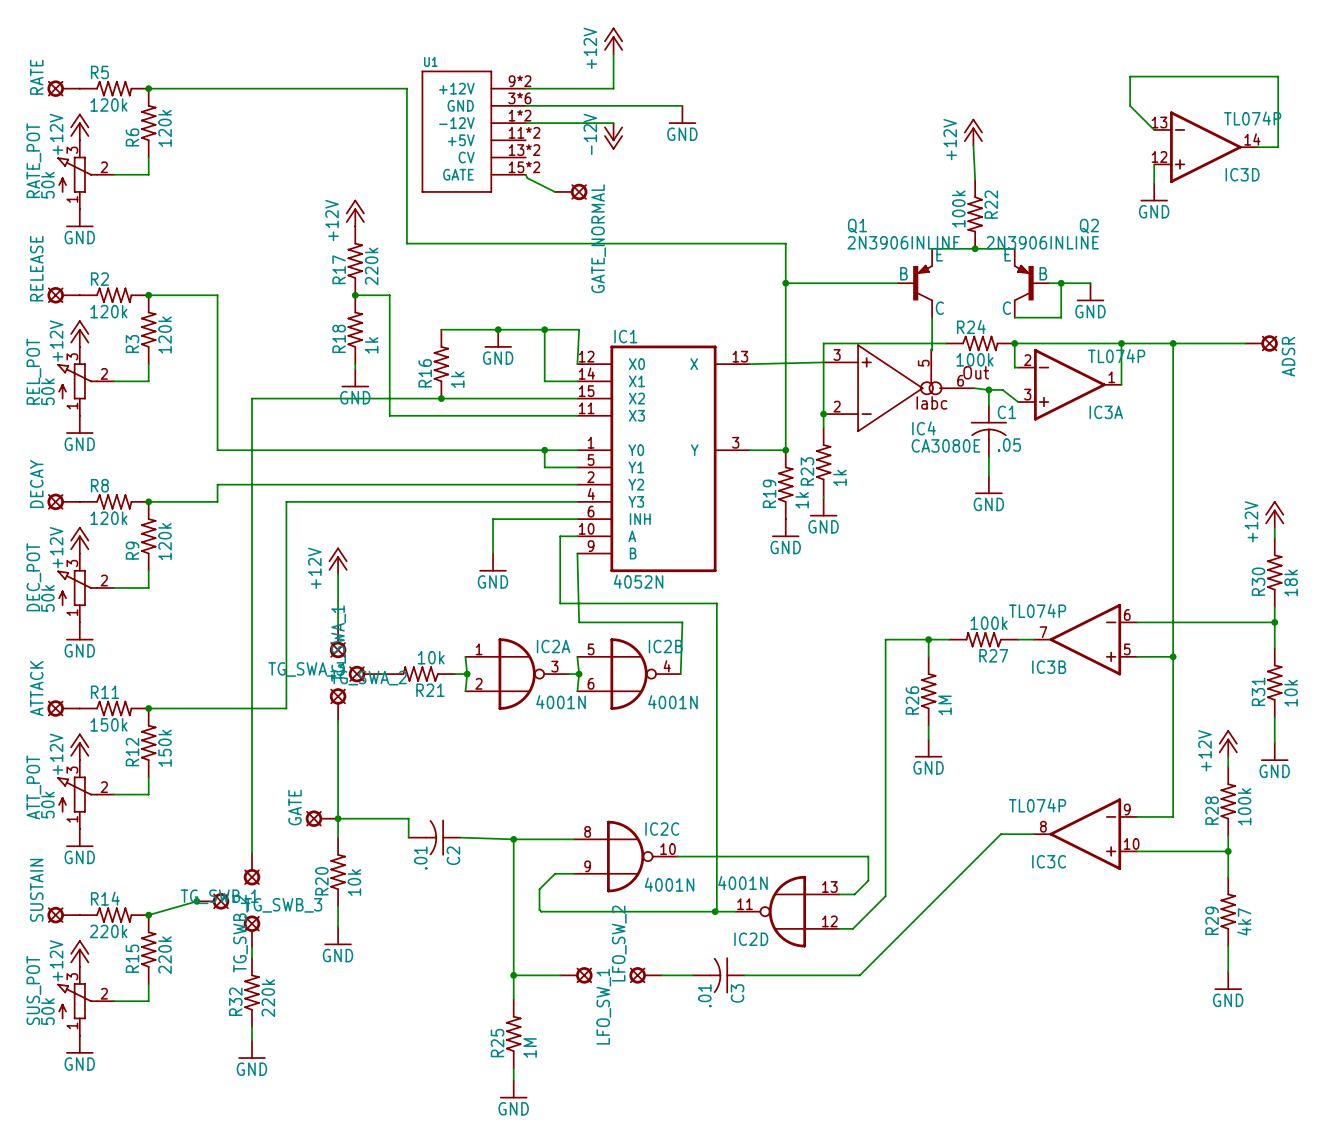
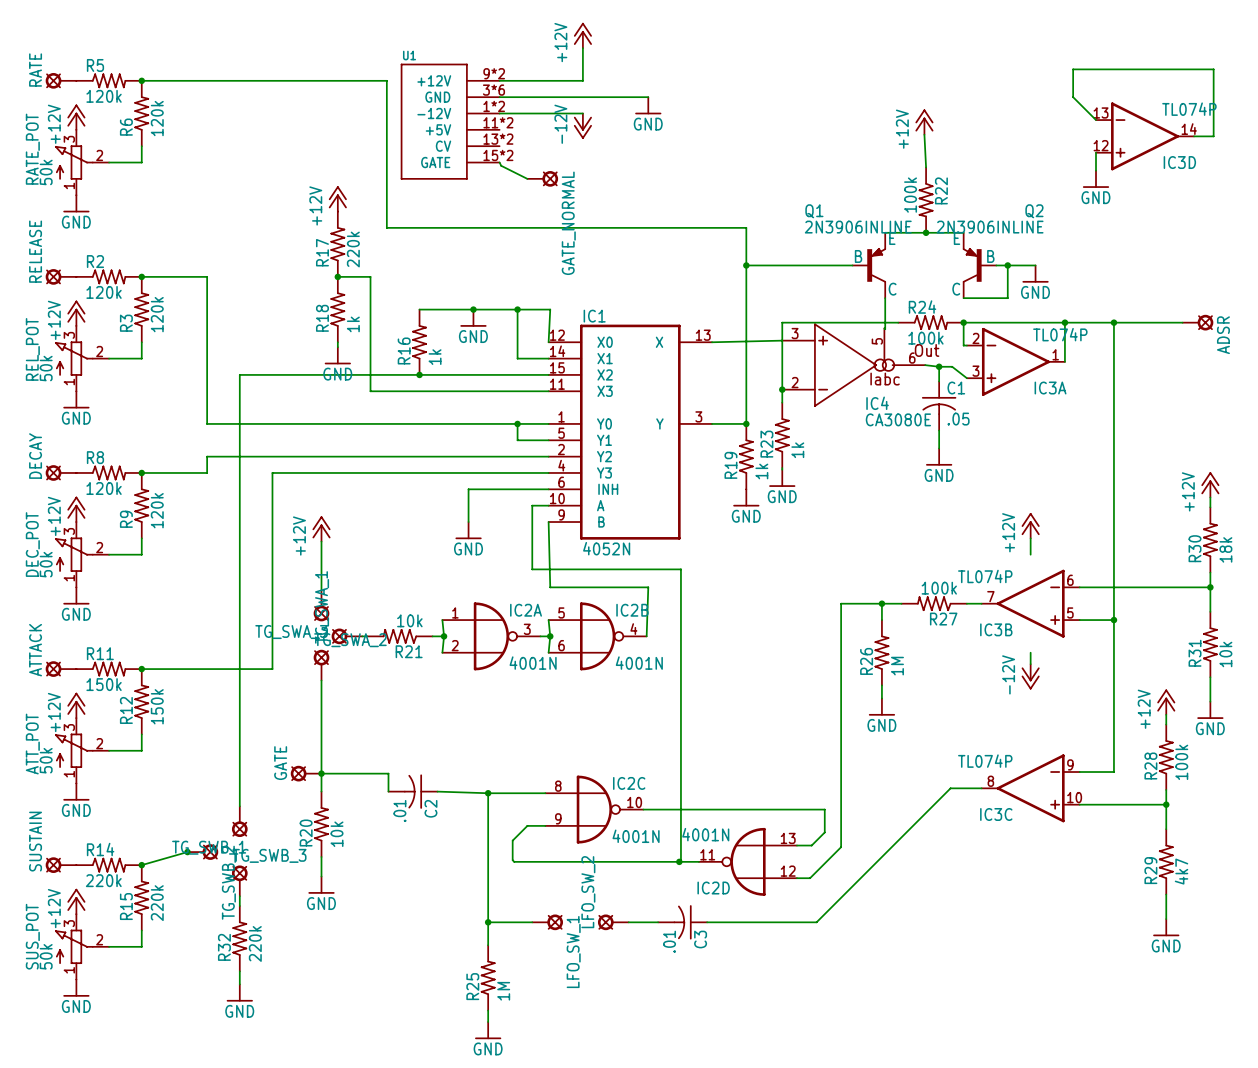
power symbol: none -> +12V (1030, 525)
wire: none -> (1030, 538) (1030, 554)
wire: none -> (1030, 652) (1030, 664)
power symbol: none -> -12V (1030, 676)

